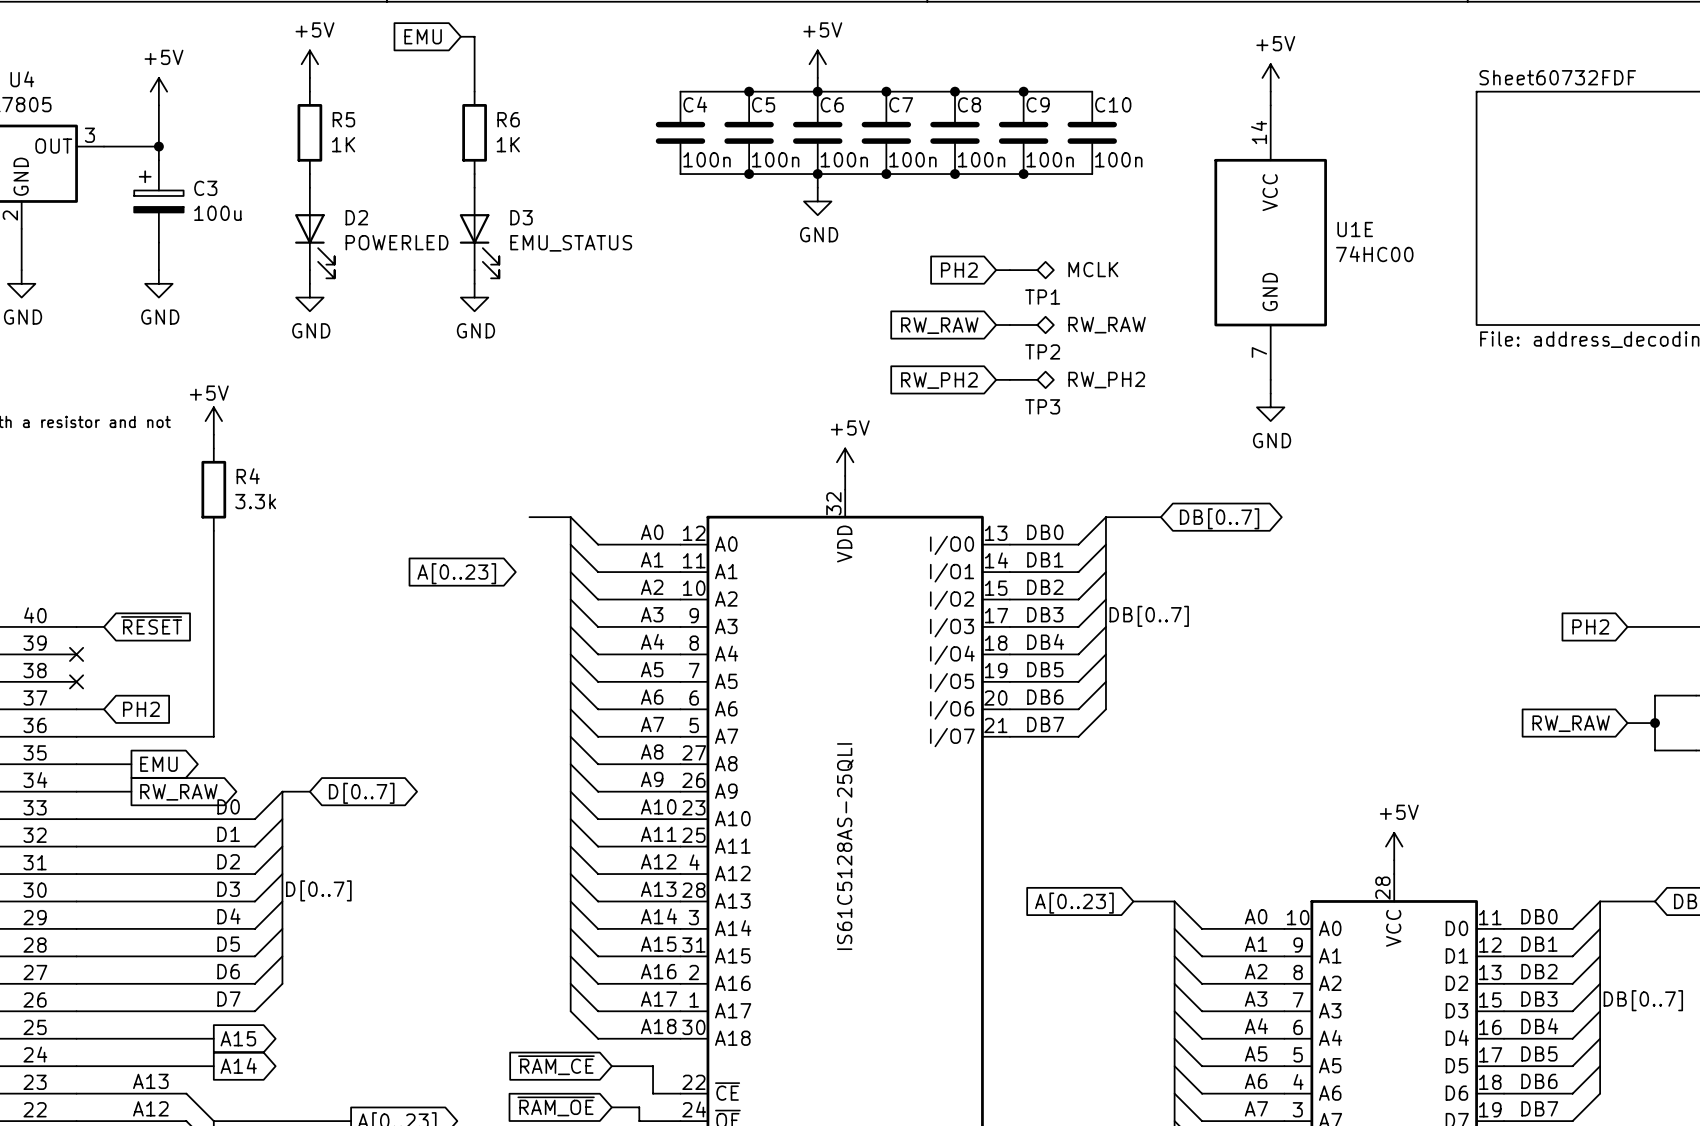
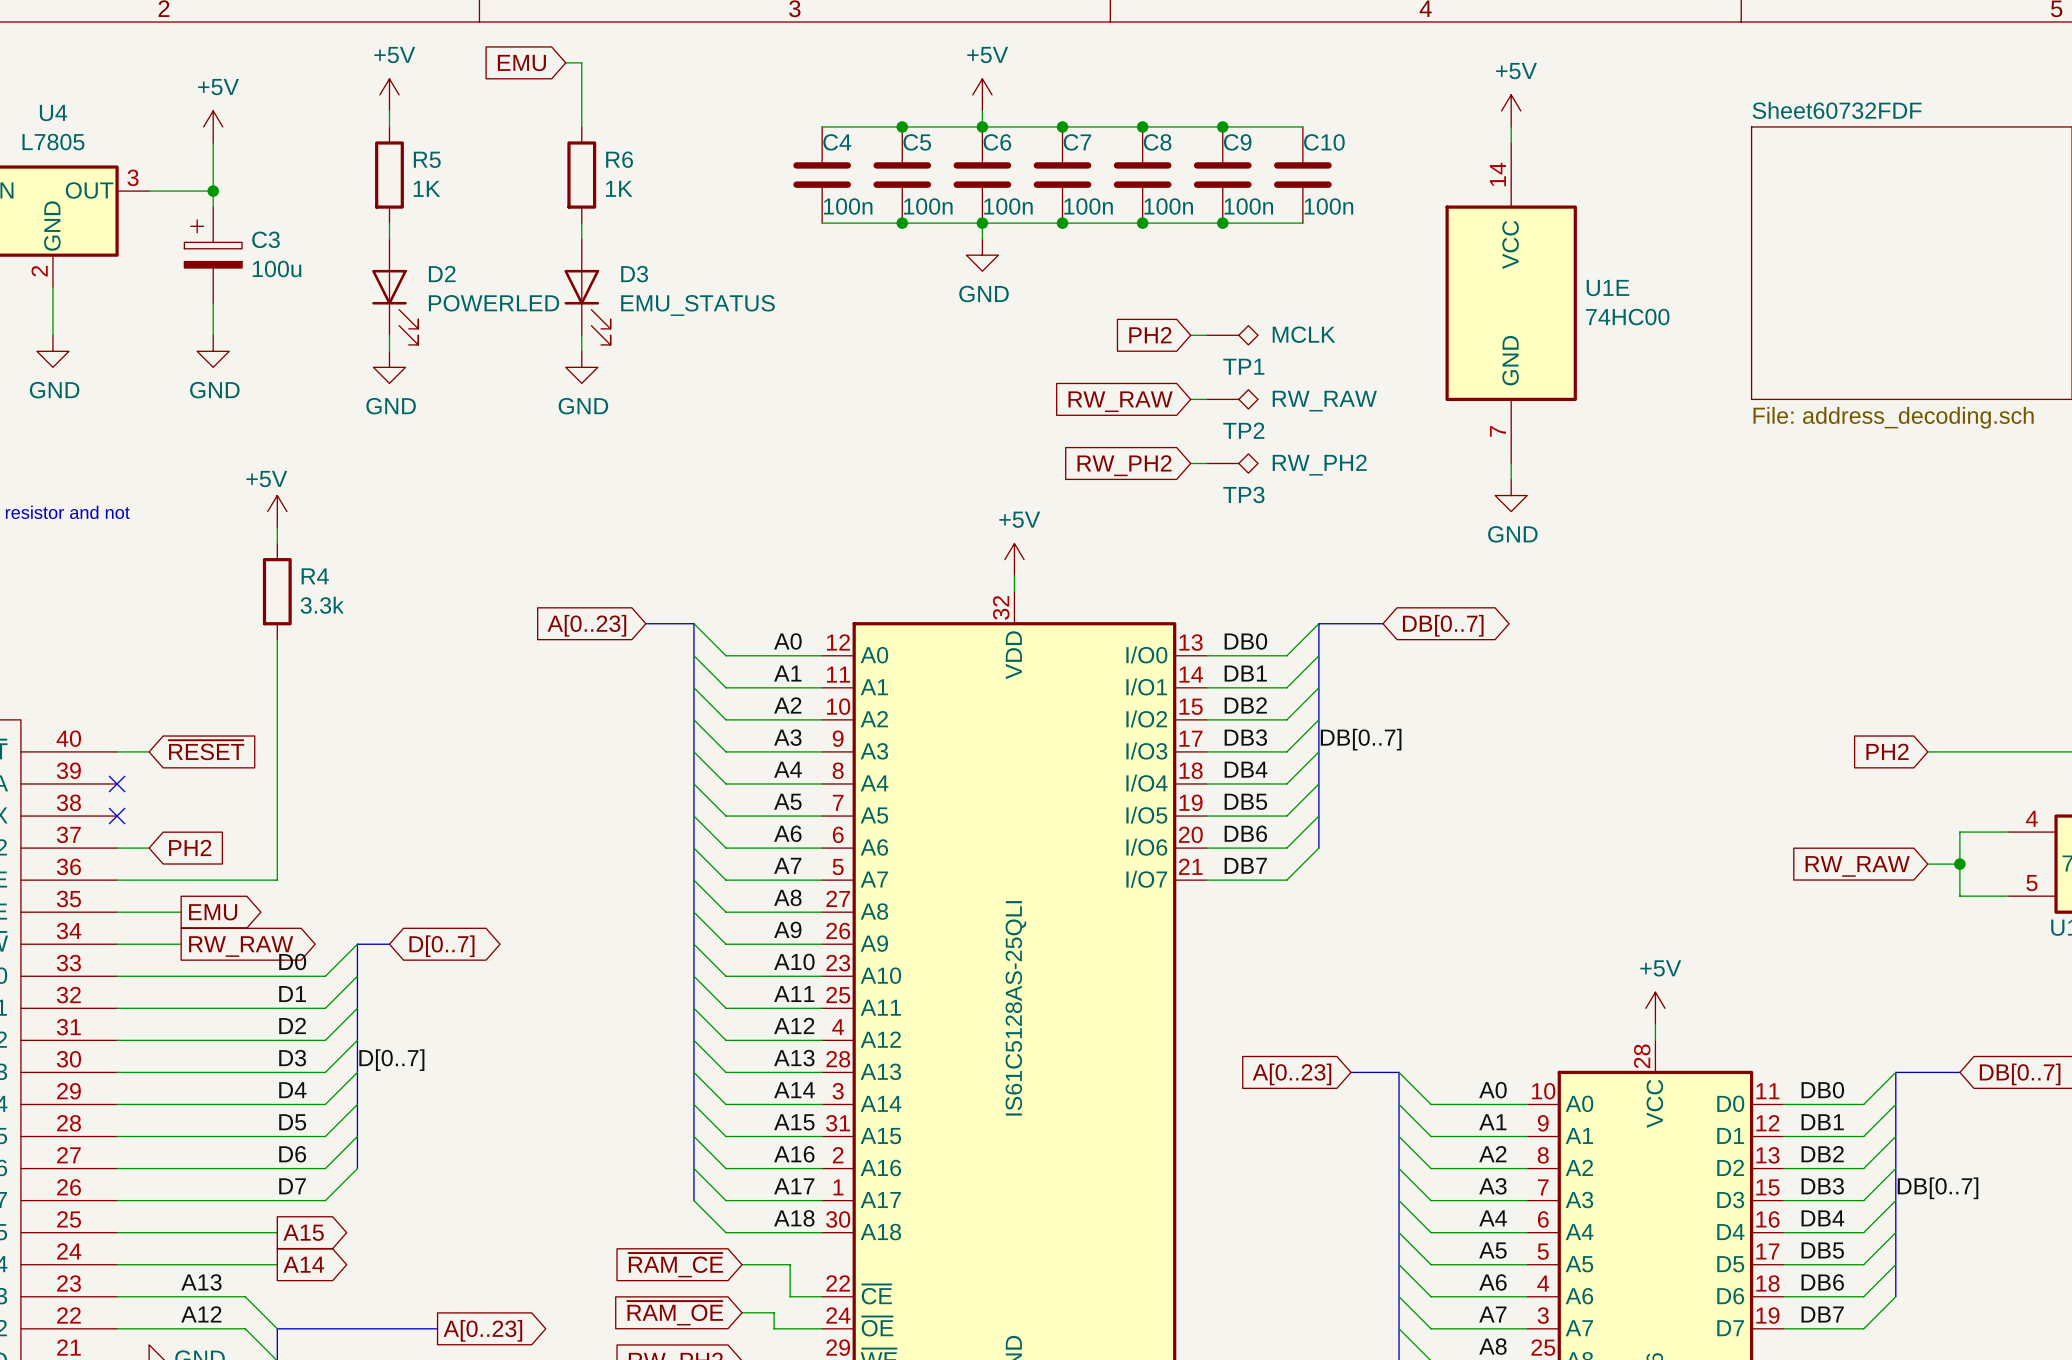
global label position: A[0..23] (456, 573) -> A[0..23] (586, 625)

